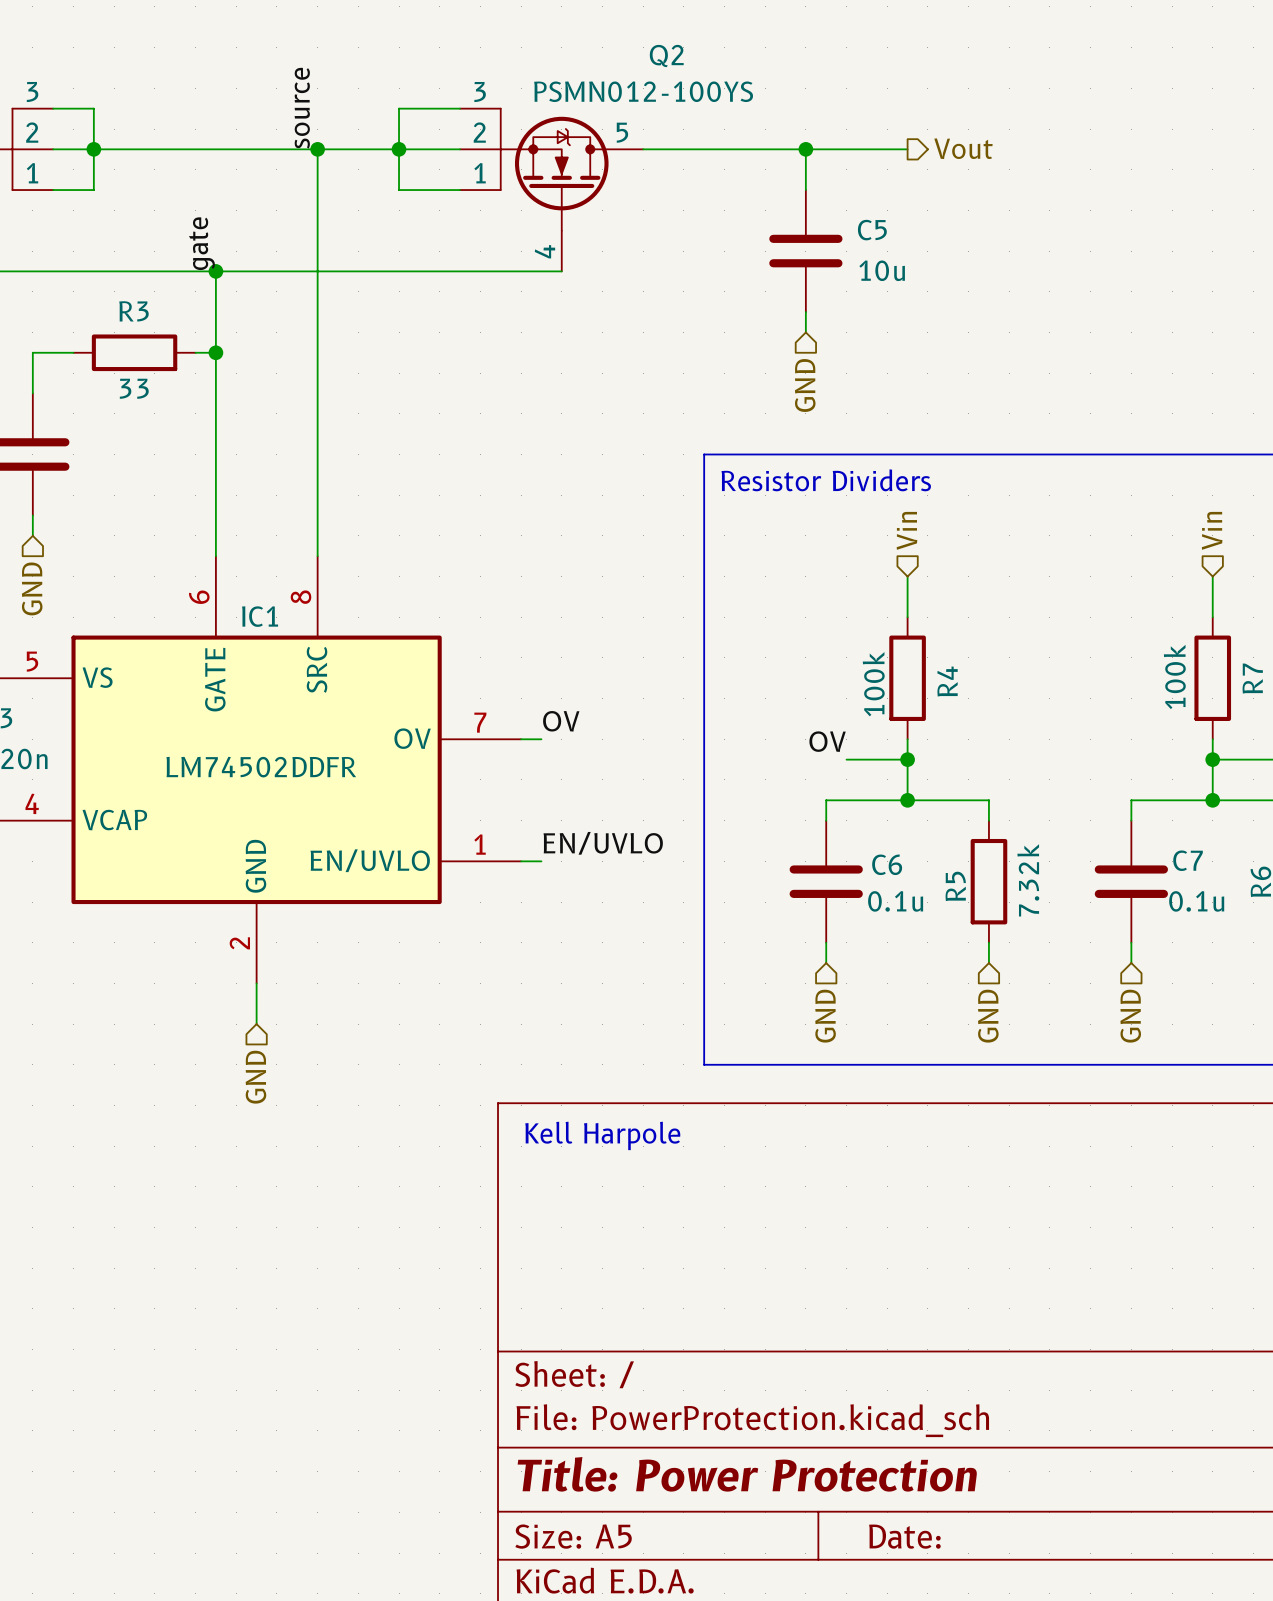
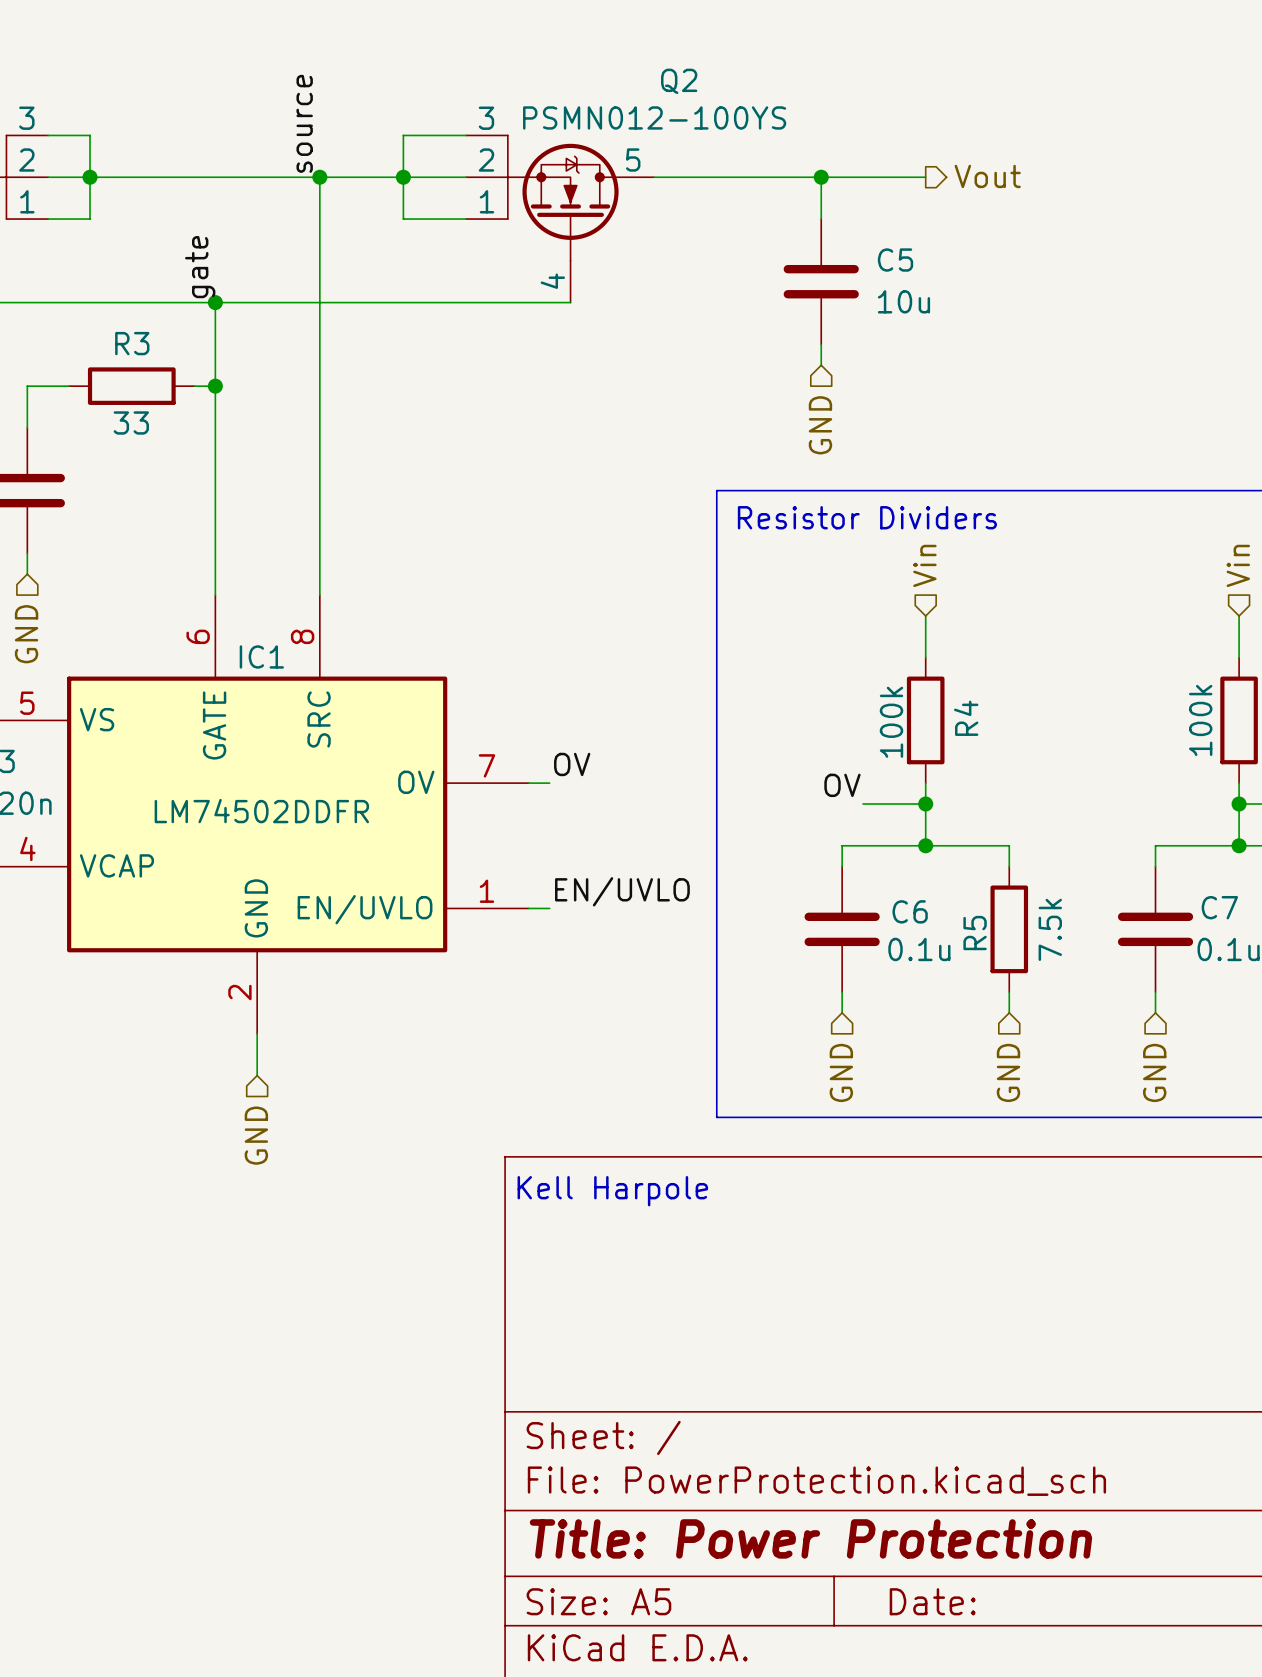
R5 value: 7.32k (1028, 880) -> 7.5k (1050, 929)

